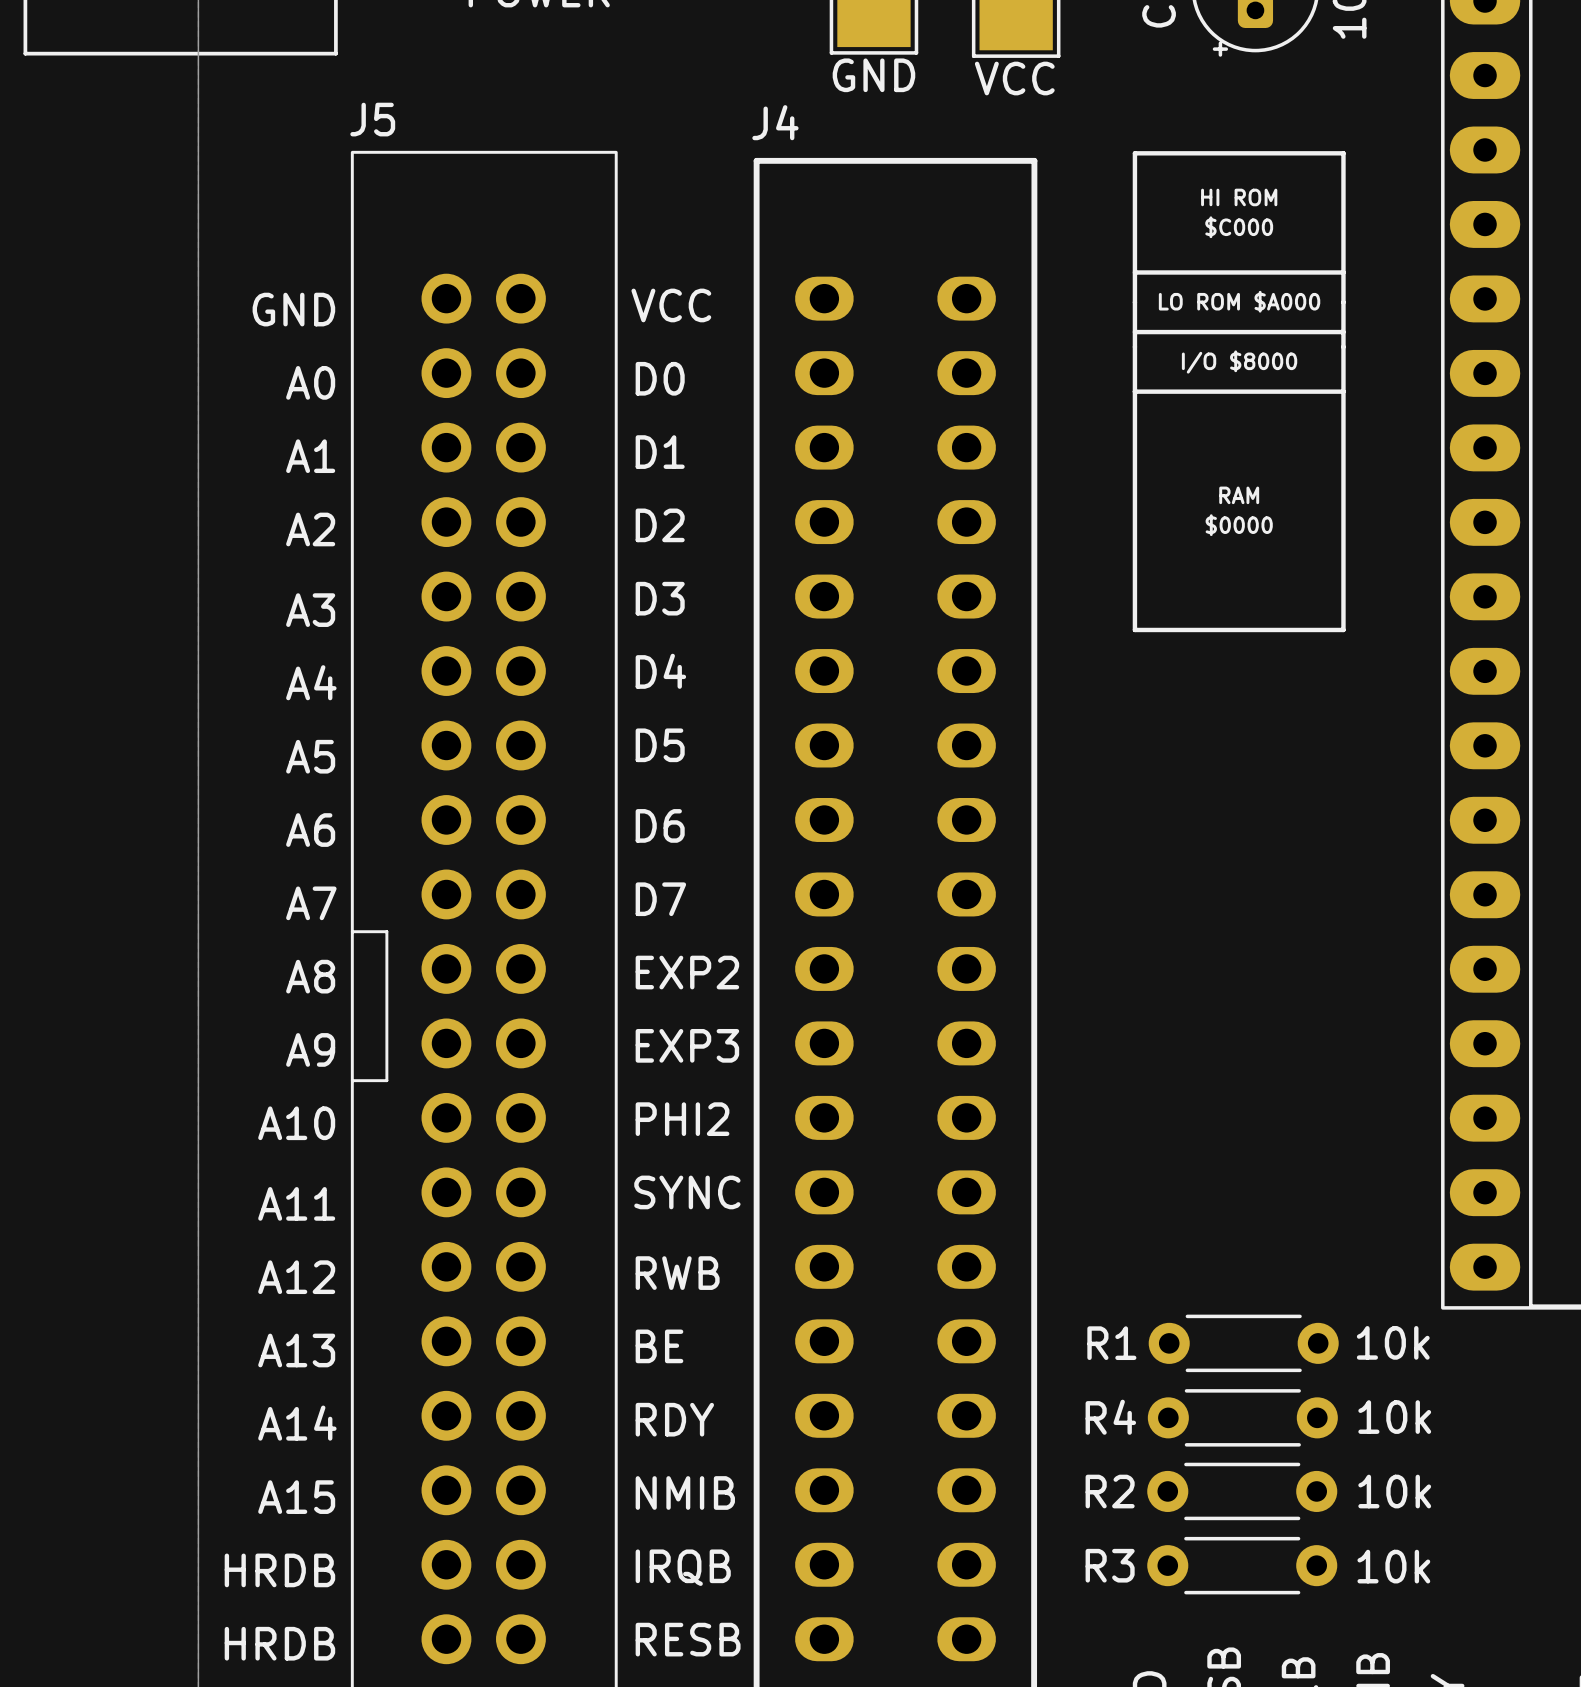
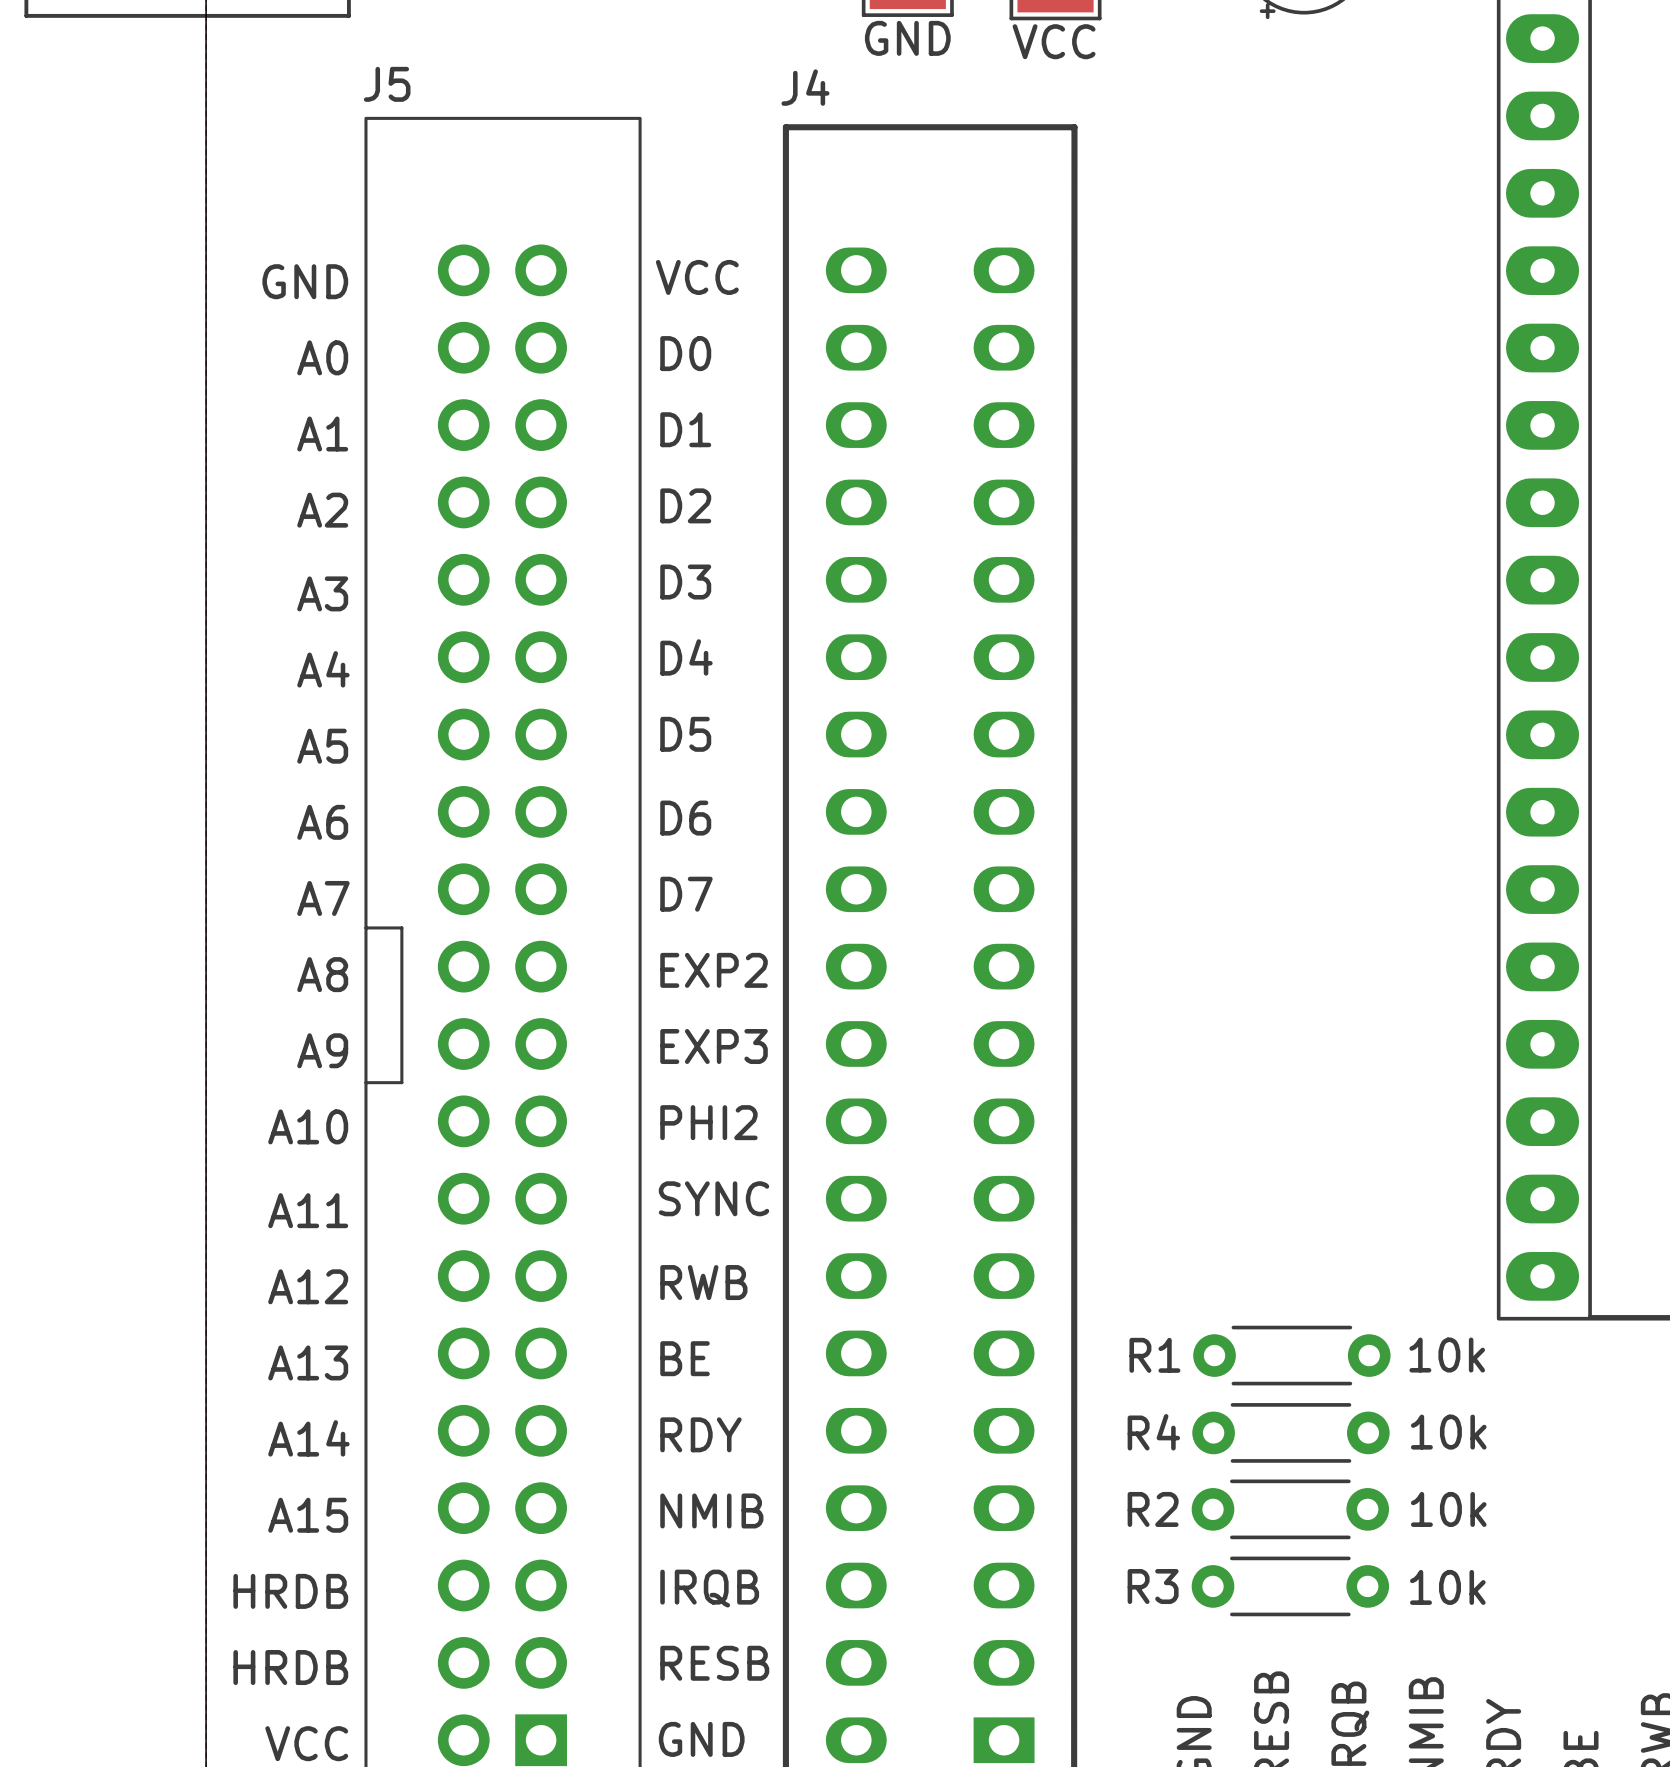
line: (1134, 153) (1343, 153) (1343, 629) (1134, 629) (1134, 153) -> none
text: HI ROM (1239, 197) -> none
text: $C000 (1239, 227) -> none
line: (1134, 272) (1343, 272) -> none
text: LO ROM $A000 (1239, 301) -> none
line: (1134, 332) (1343, 332) -> none
text: I/O $8000 (1239, 362) -> none
line: (1134, 391) (1343, 391) -> none
text: RAM (1239, 495) -> none
text: $0000 (1239, 525) -> none

